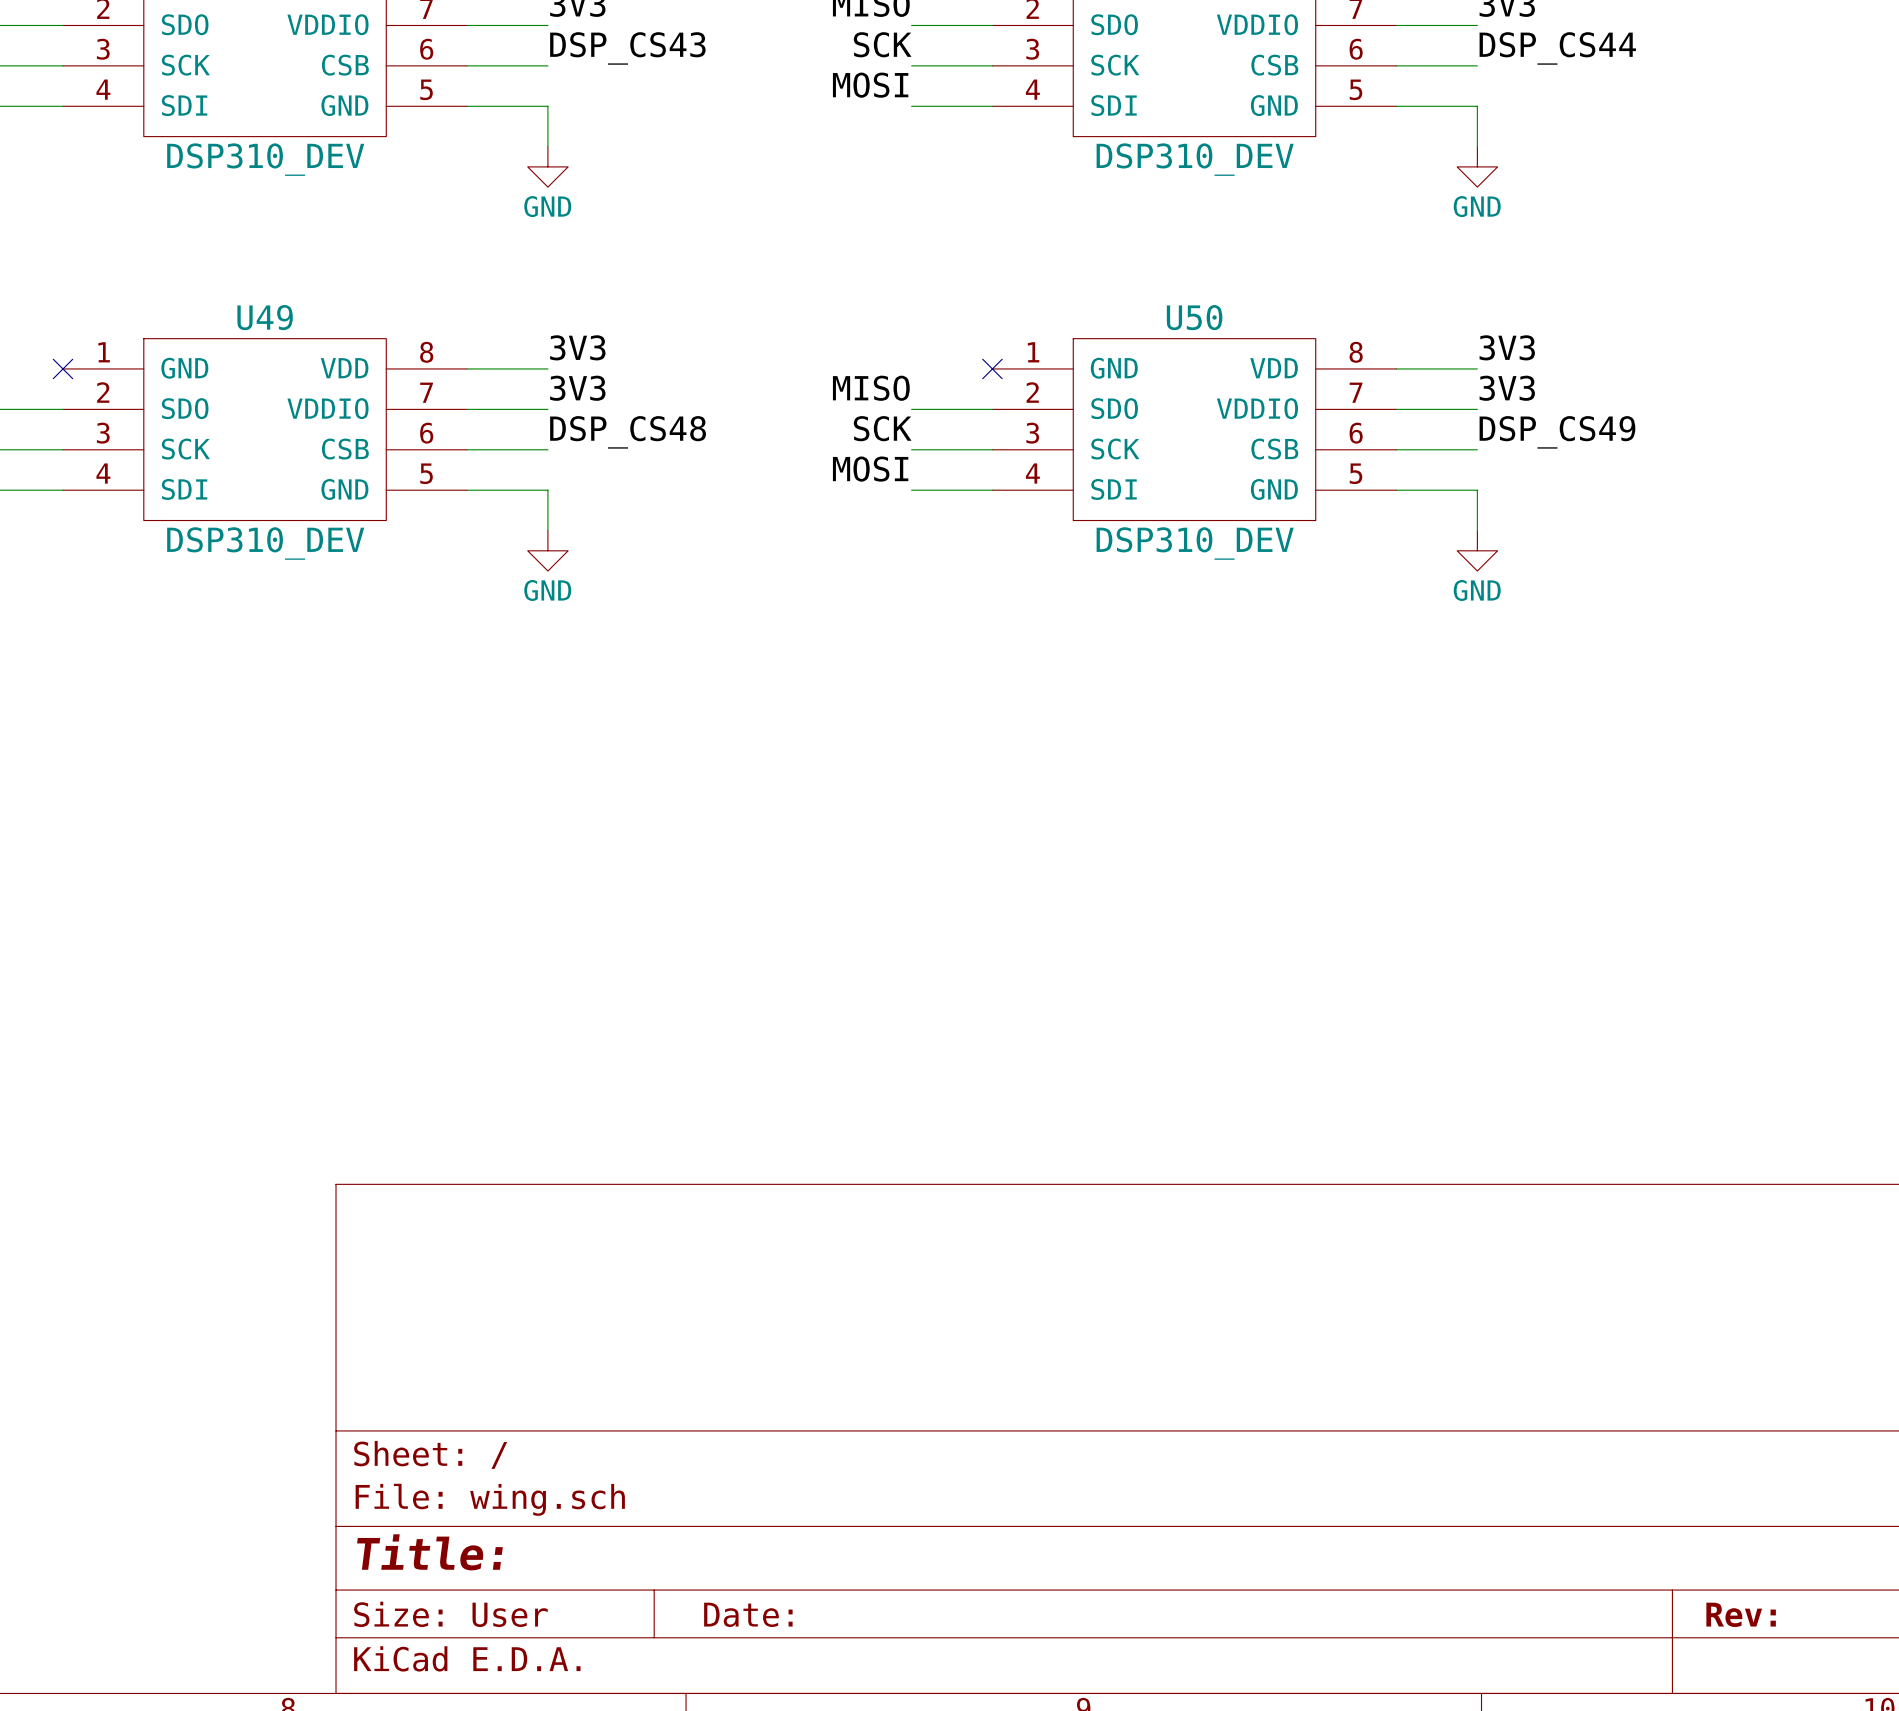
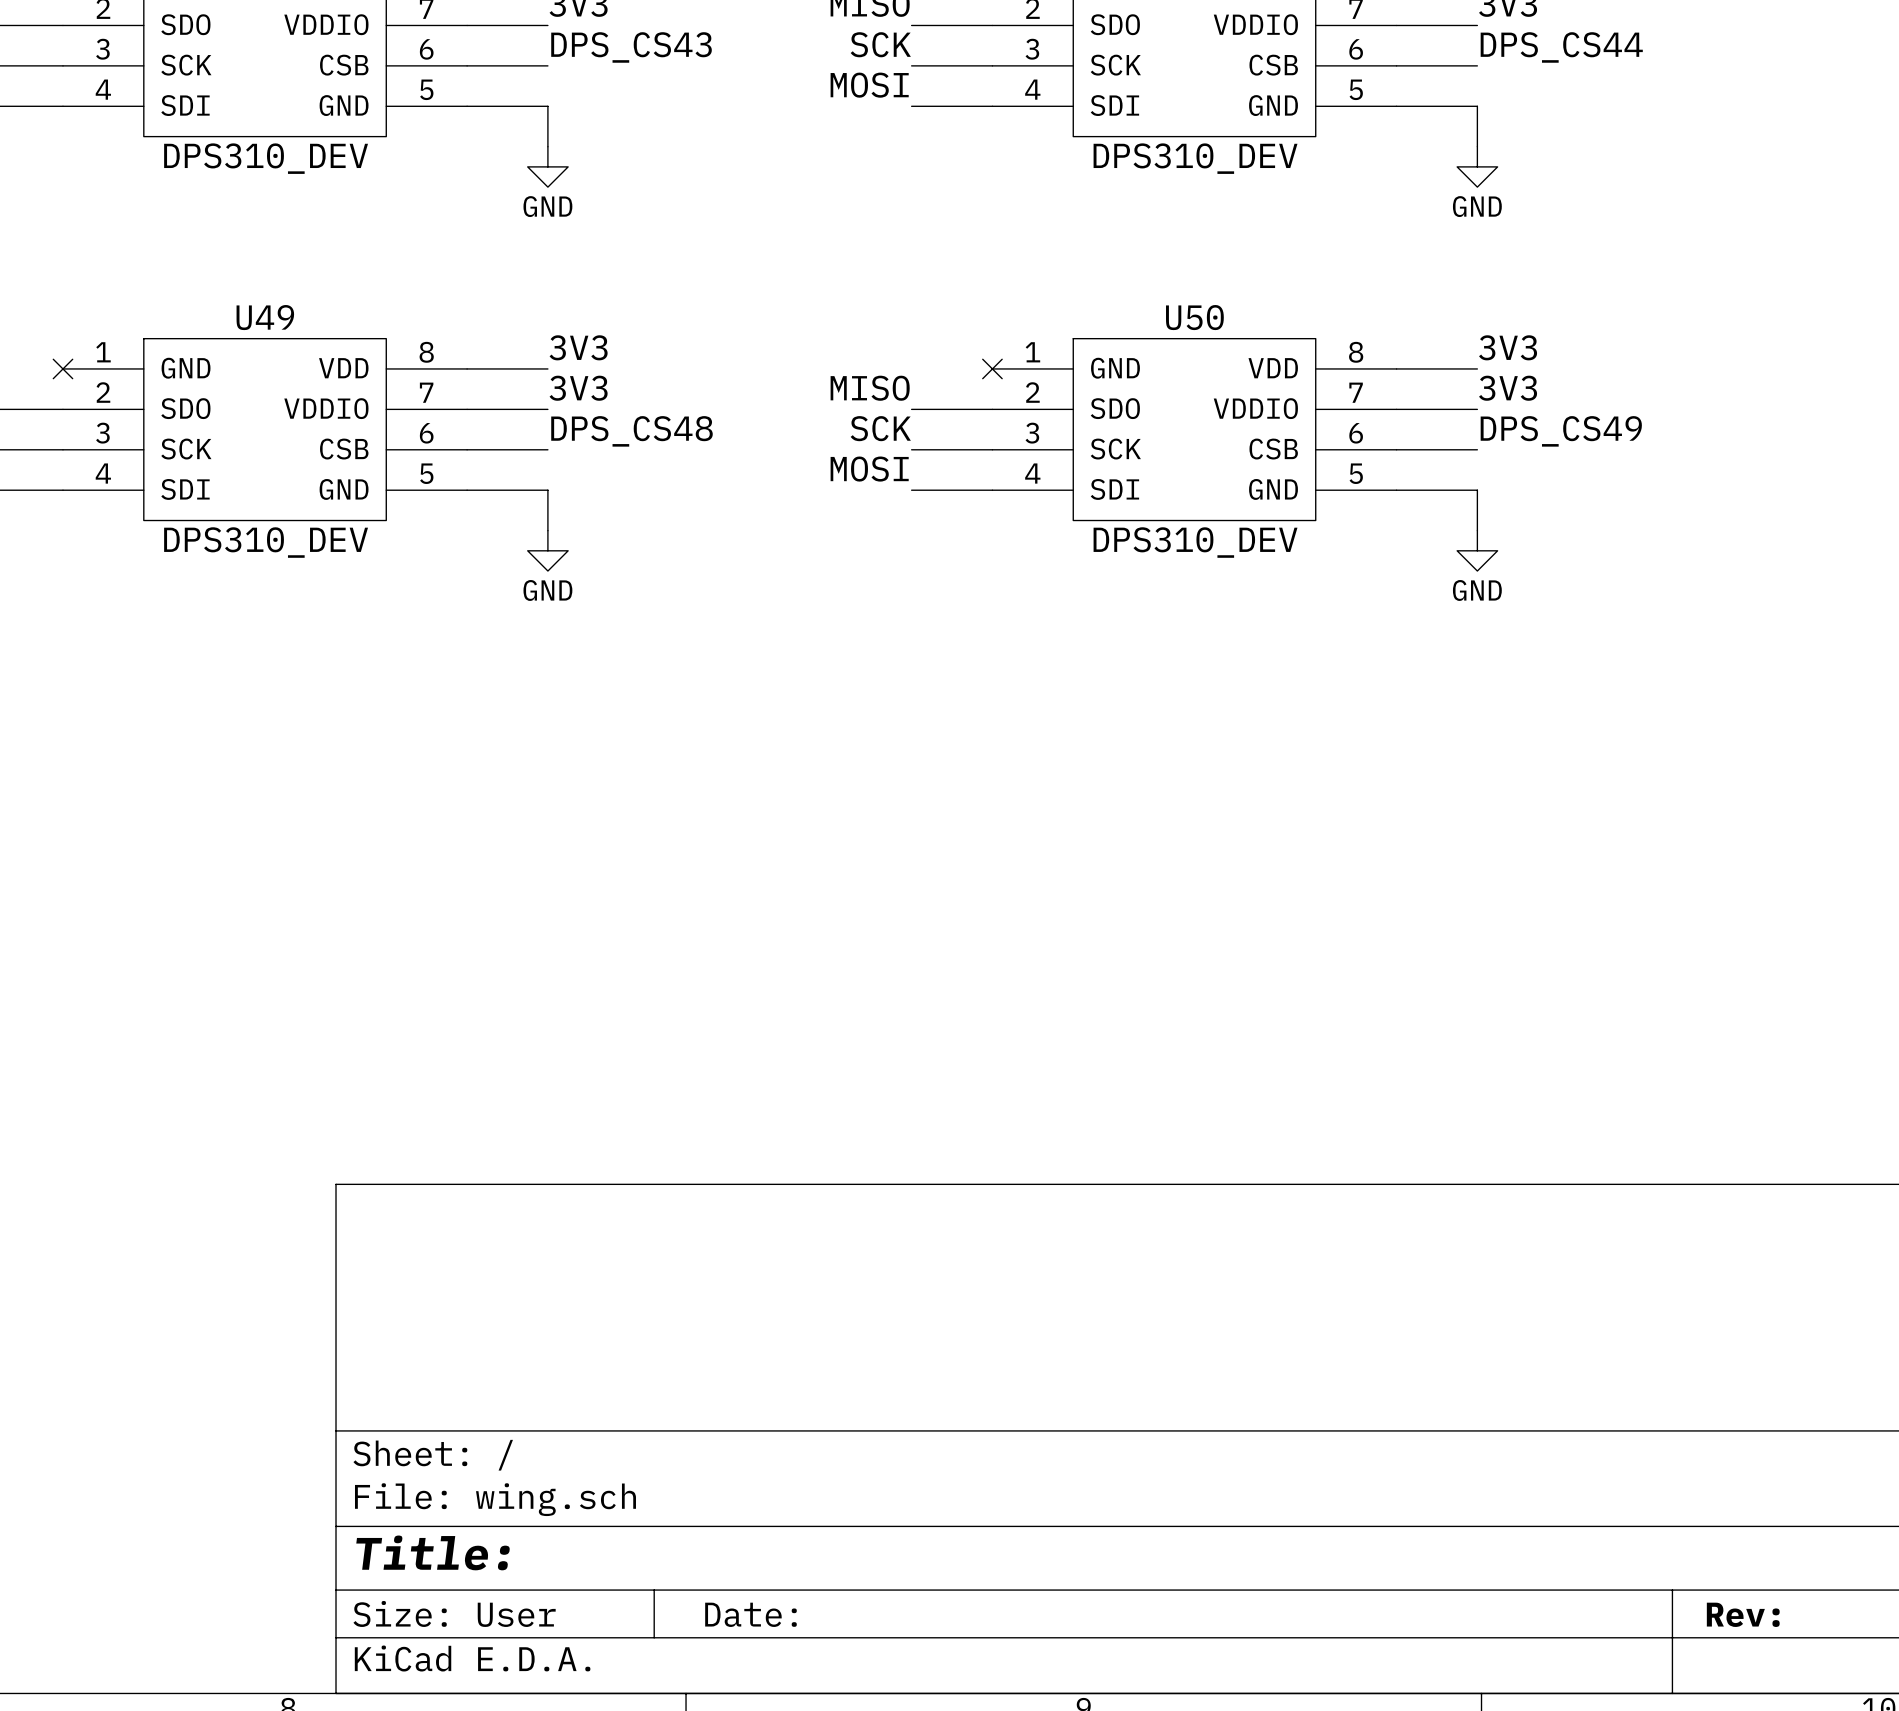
label: DSP_CS43 (627, 48) -> DPS_CS43 (631, 47)
label: DSP_CS44 (1557, 48) -> DPS_CS44 (1561, 47)
part value: DSP310_DEV (265, 159) -> DPS310_DEV (266, 158)
part value: DSP310_DEV (1195, 159) -> DPS310_DEV (1195, 158)
label: DSP_CS48 (628, 432) -> DPS_CS48 (631, 431)
label: DSP_CS49 (1557, 432) -> DPS_CS49 (1561, 431)
U49 value: DSP310_DEV (265, 543) -> DPS310_DEV (266, 542)
U50 value: DSP310_DEV (1195, 543) -> DPS310_DEV (1195, 542)

